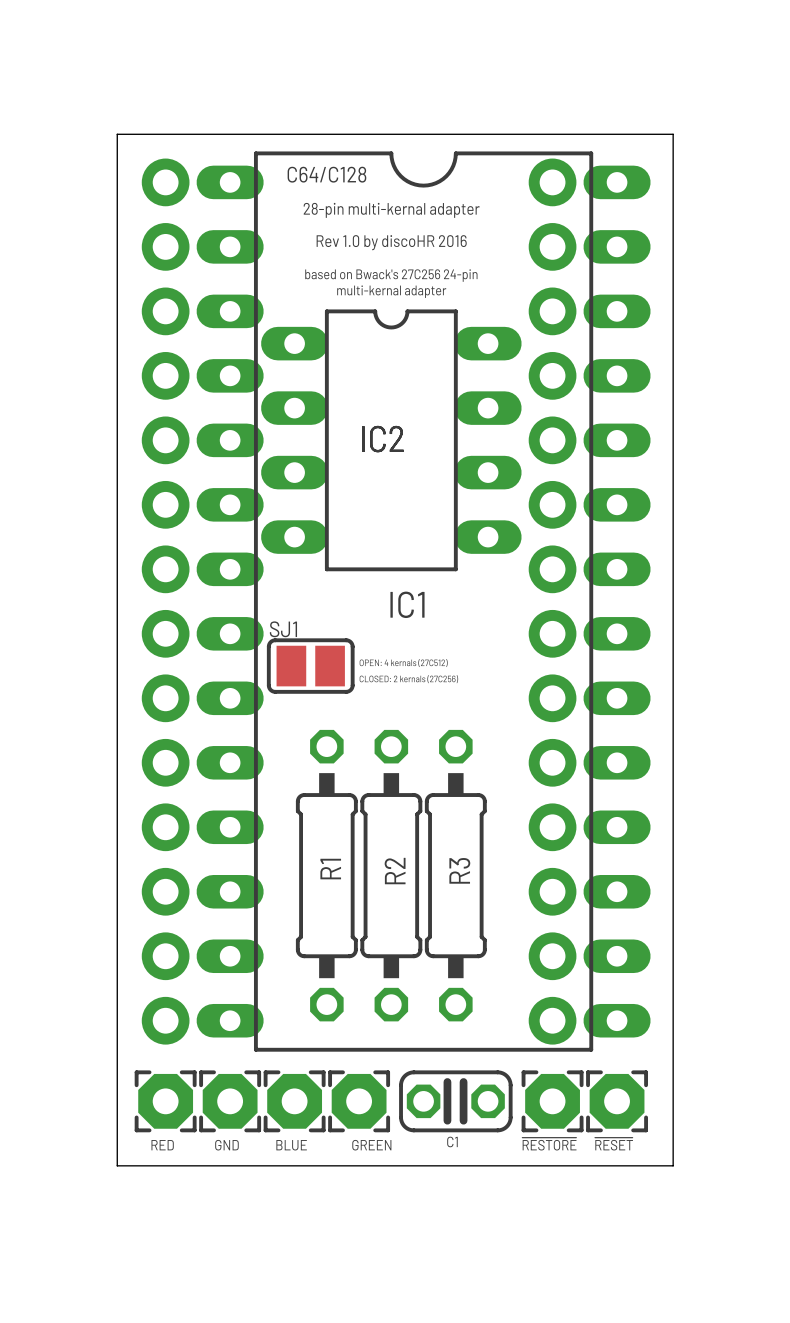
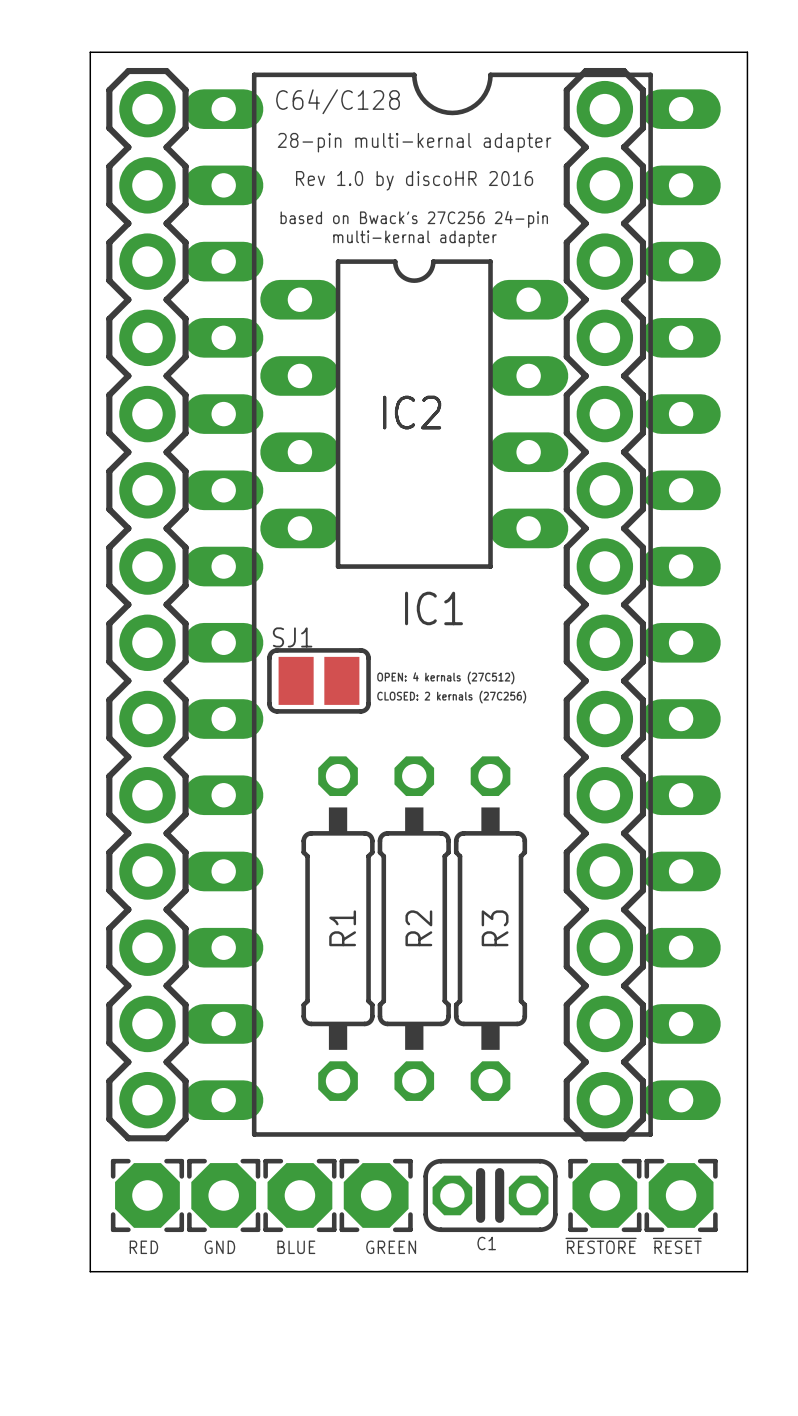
part side: bottom (165, 601) -> top (147, 604)
part side: bottom (552, 601) -> top (604, 604)

